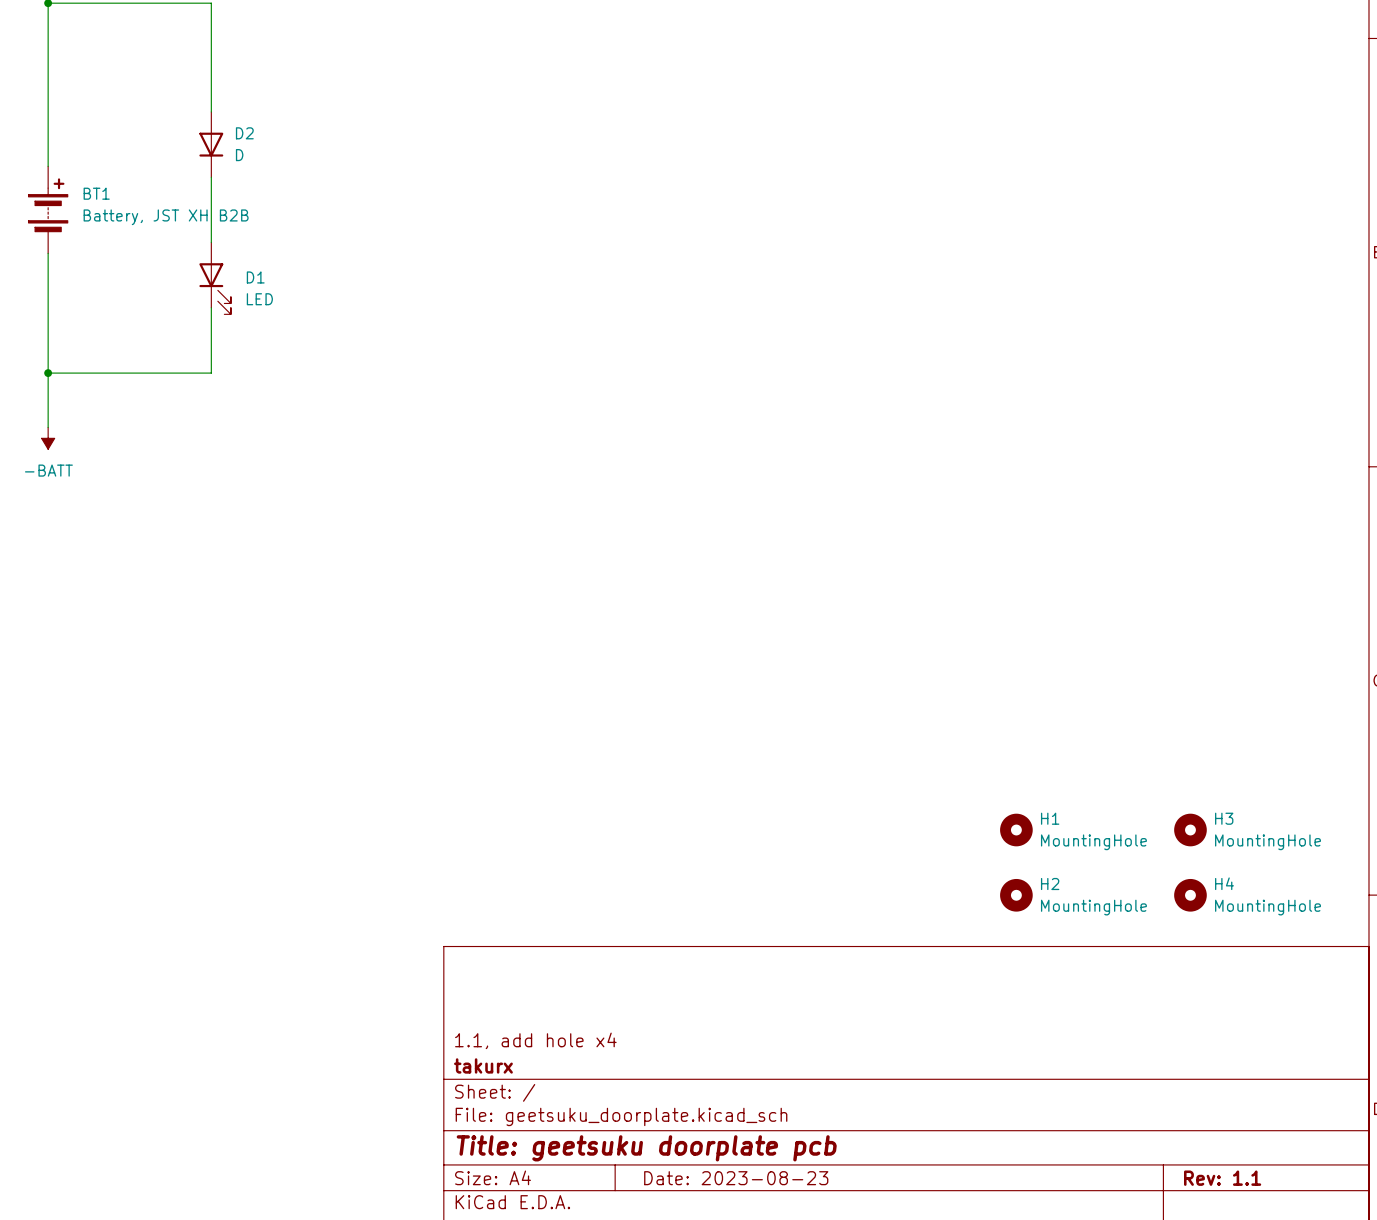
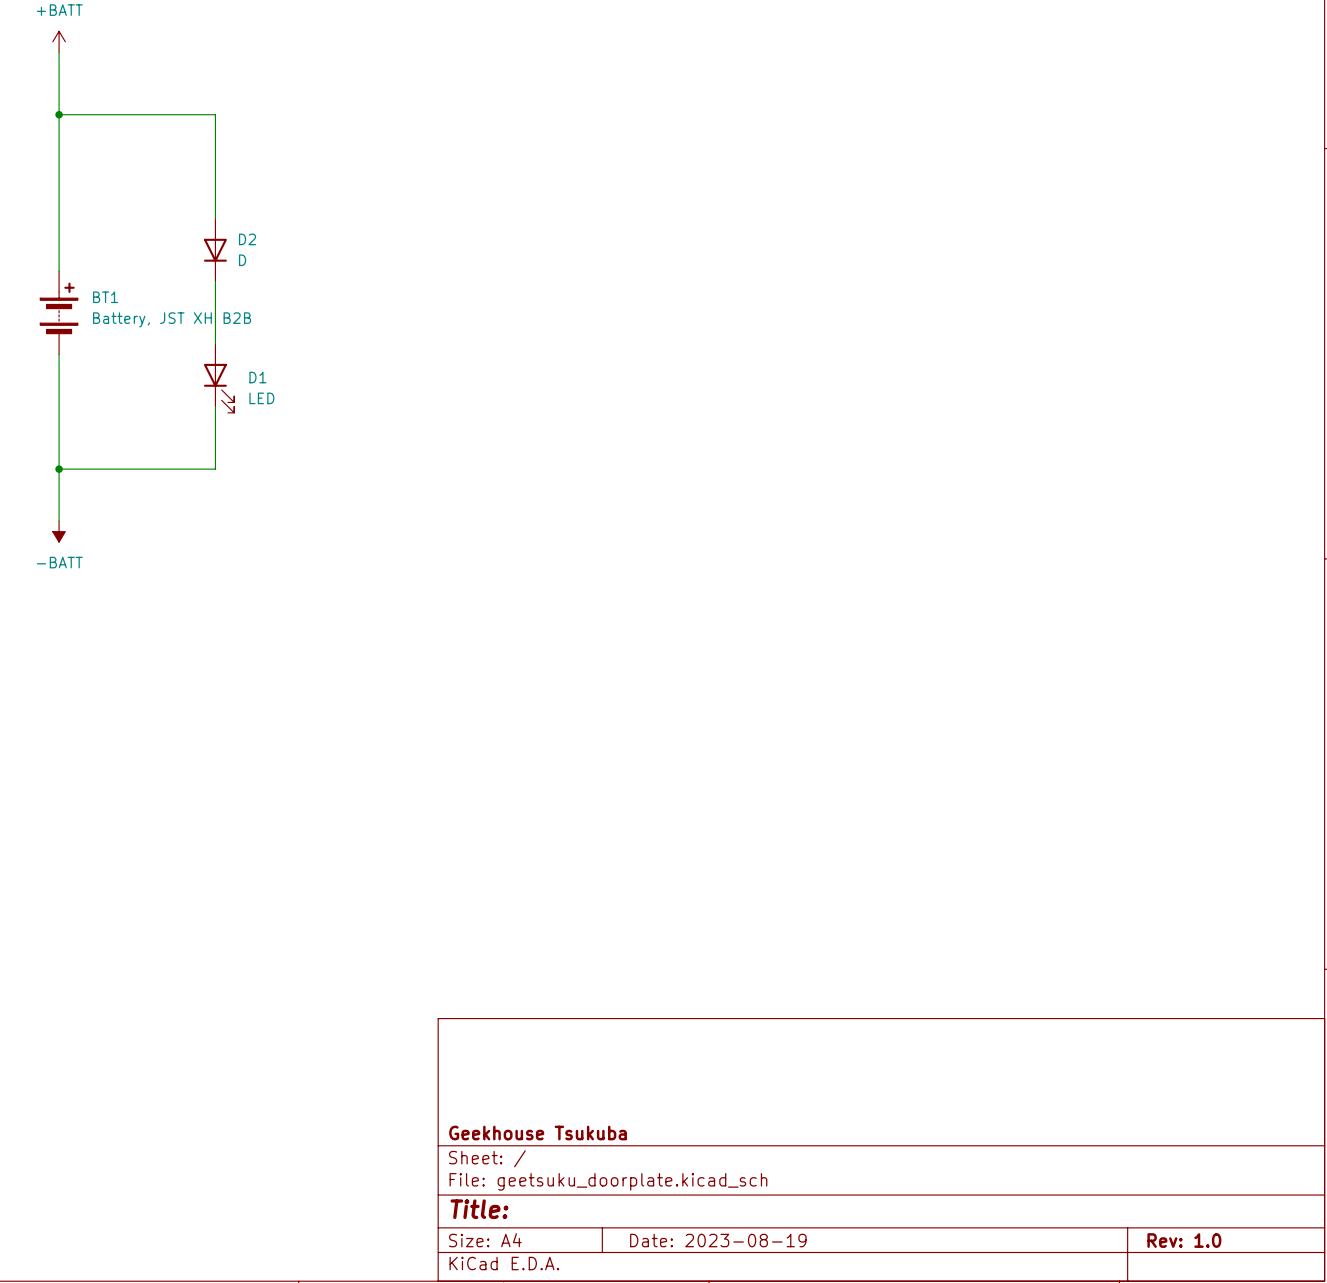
H1: MountingHole (1016, 830) -> none
H3: MountingHole (1190, 830) -> none
H2: MountingHole (1016, 895) -> none
H4: MountingHole (1190, 895) -> none
title block: 1.1, add hole x4 (535, 1040) -> none
title block: takurx (483, 1065) -> Geekhouse Tsukuba (538, 1133)
title block: Title: geetsuku doorplate pcb (646, 1148) -> Title: (479, 1209)
title block: Date: 2023-08-23 (736, 1178) -> Date: 2023-08-19 (718, 1240)
title block: Rev: 1.1 (1222, 1178) -> Rev: 1.0 (1184, 1240)

